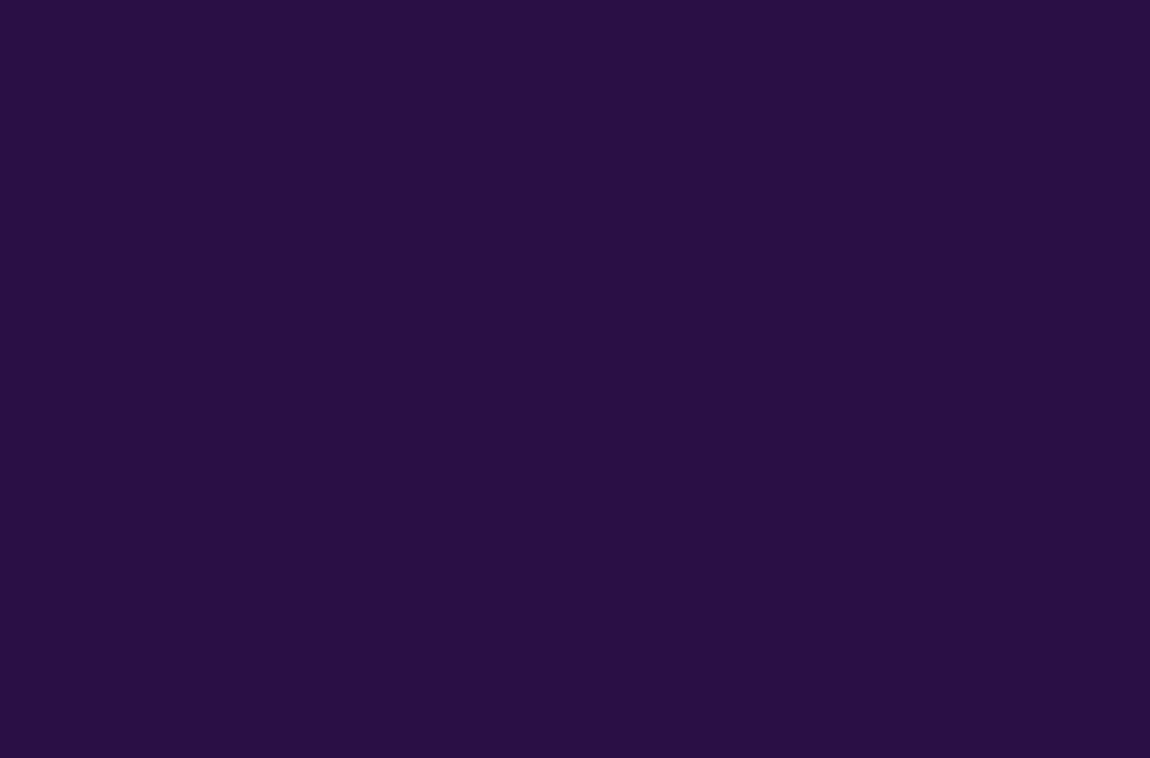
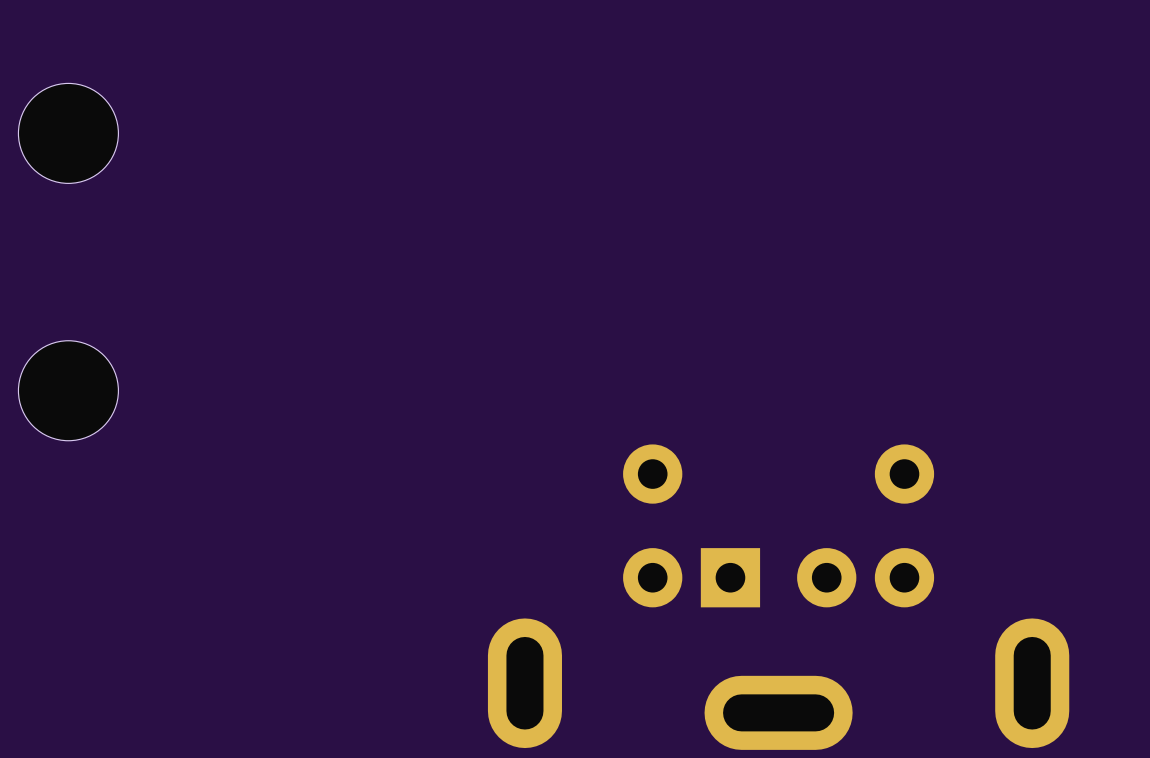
part: none -> (68, 133)
part: none -> (68, 390)
part: none -> (778, 597)

